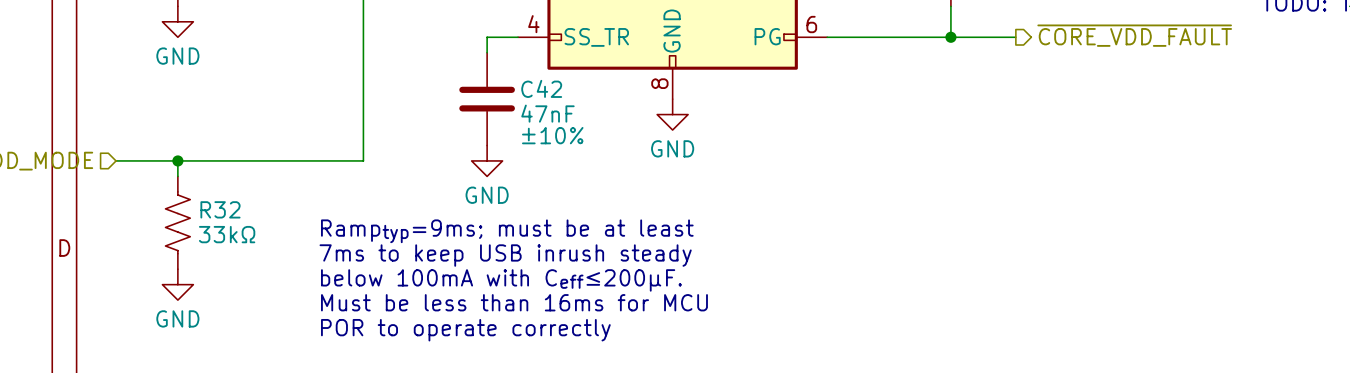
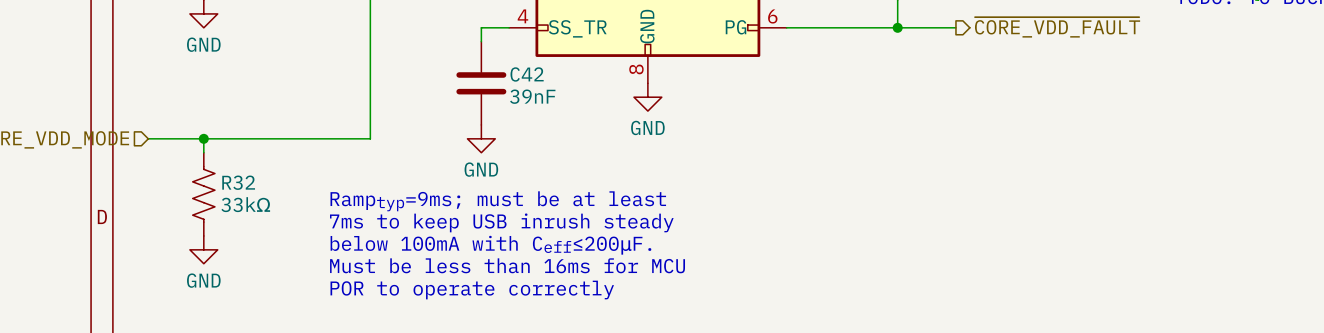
C42 value: 47nF (547, 113) -> 39nF (532, 96)
C42 text: ±10% (552, 135) -> none

